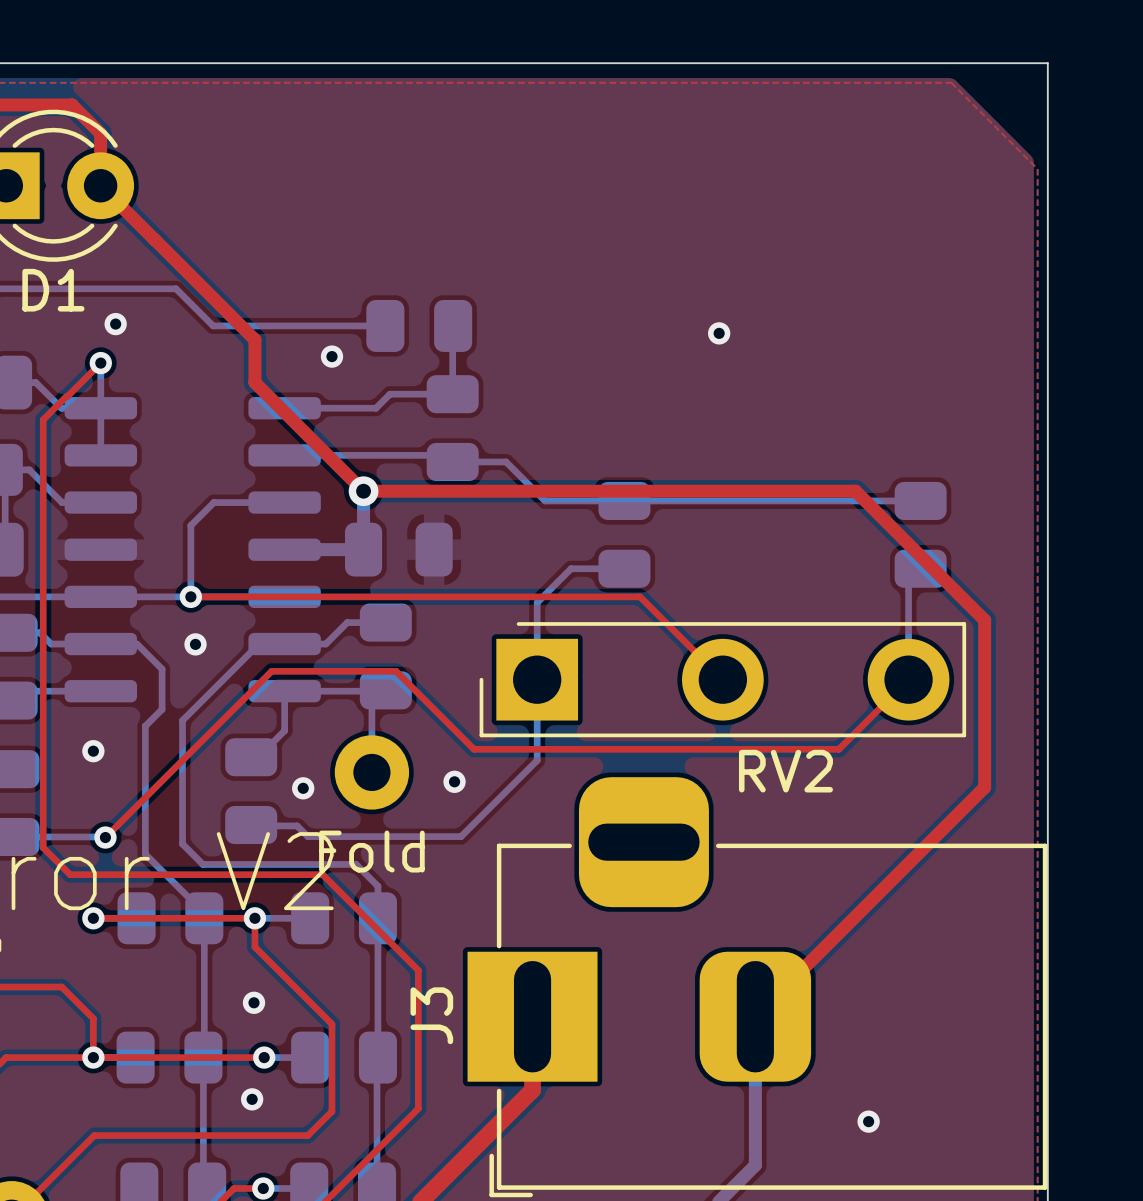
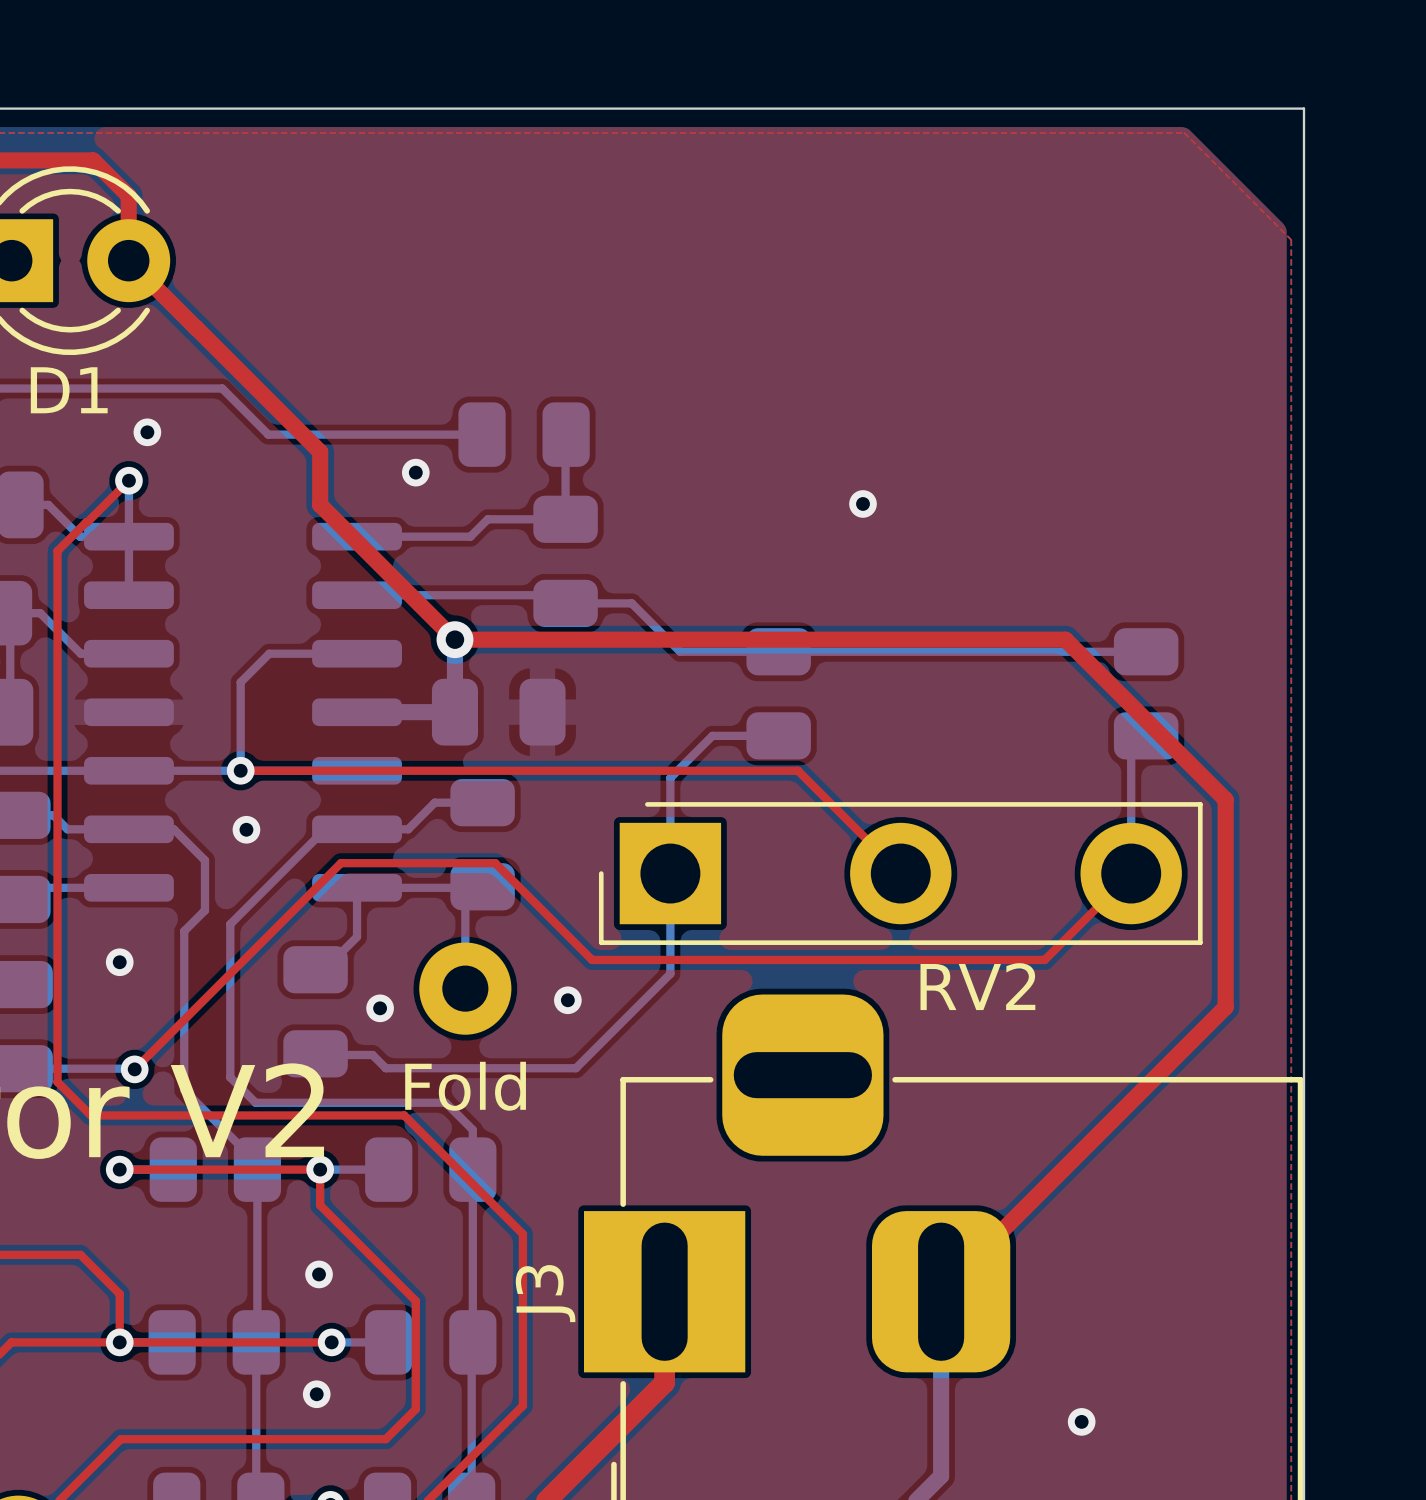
via position: (719, 333) -> (863, 503)

